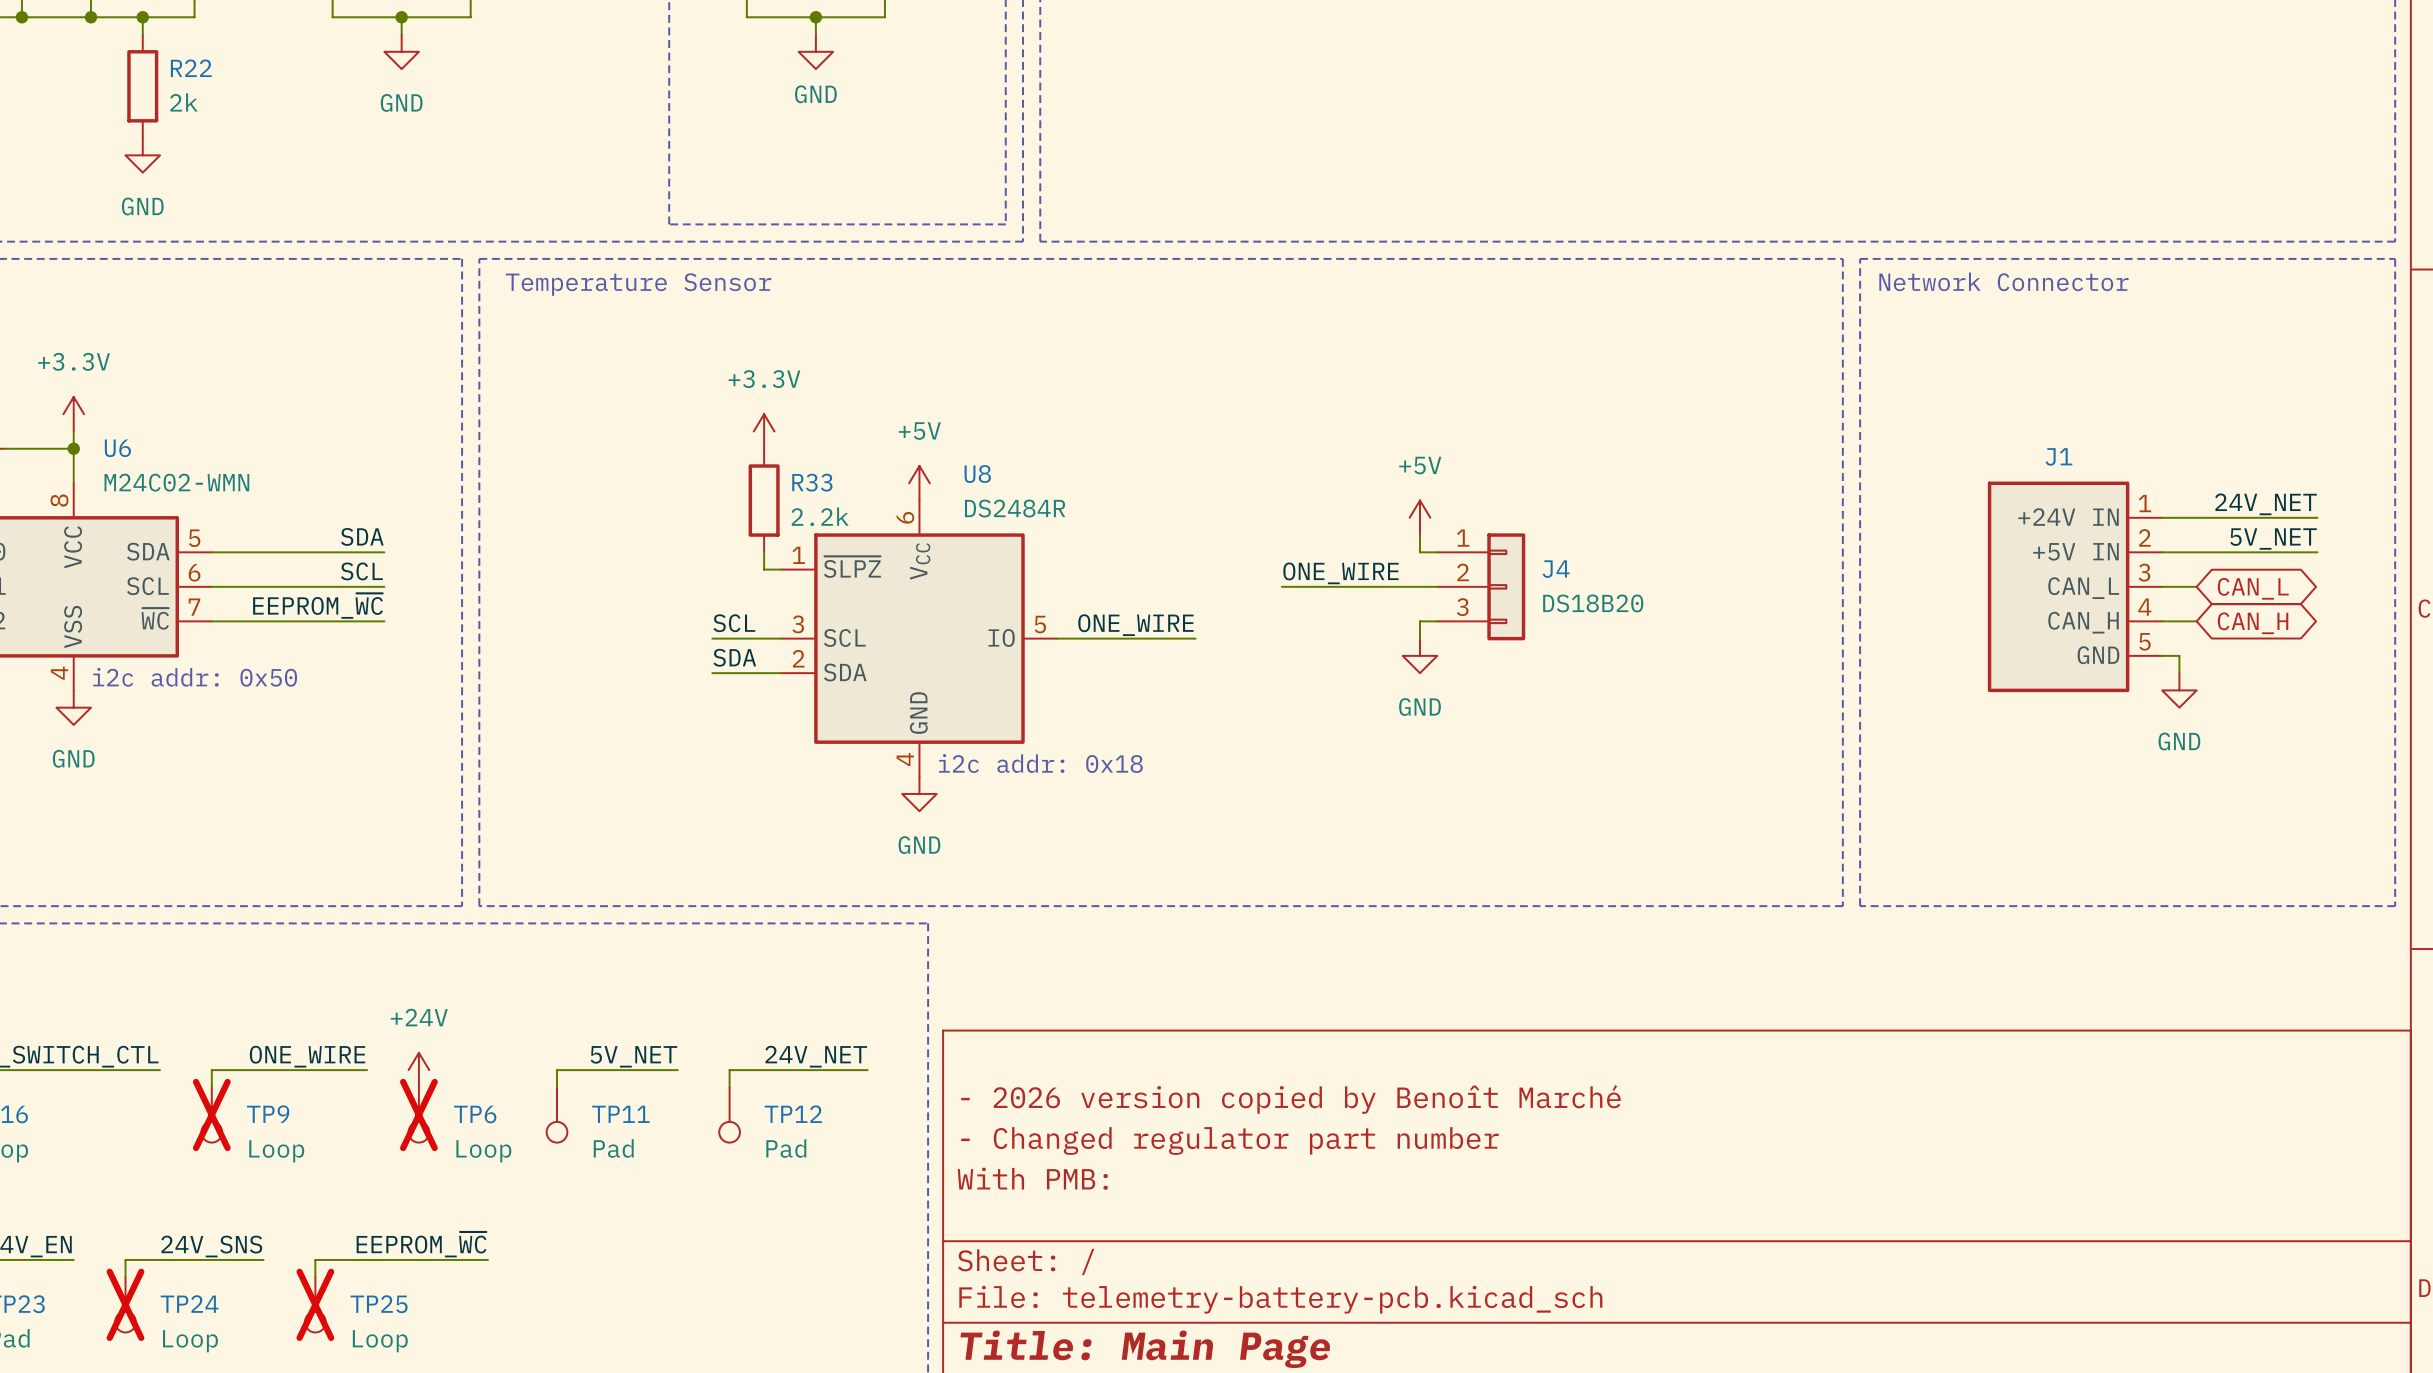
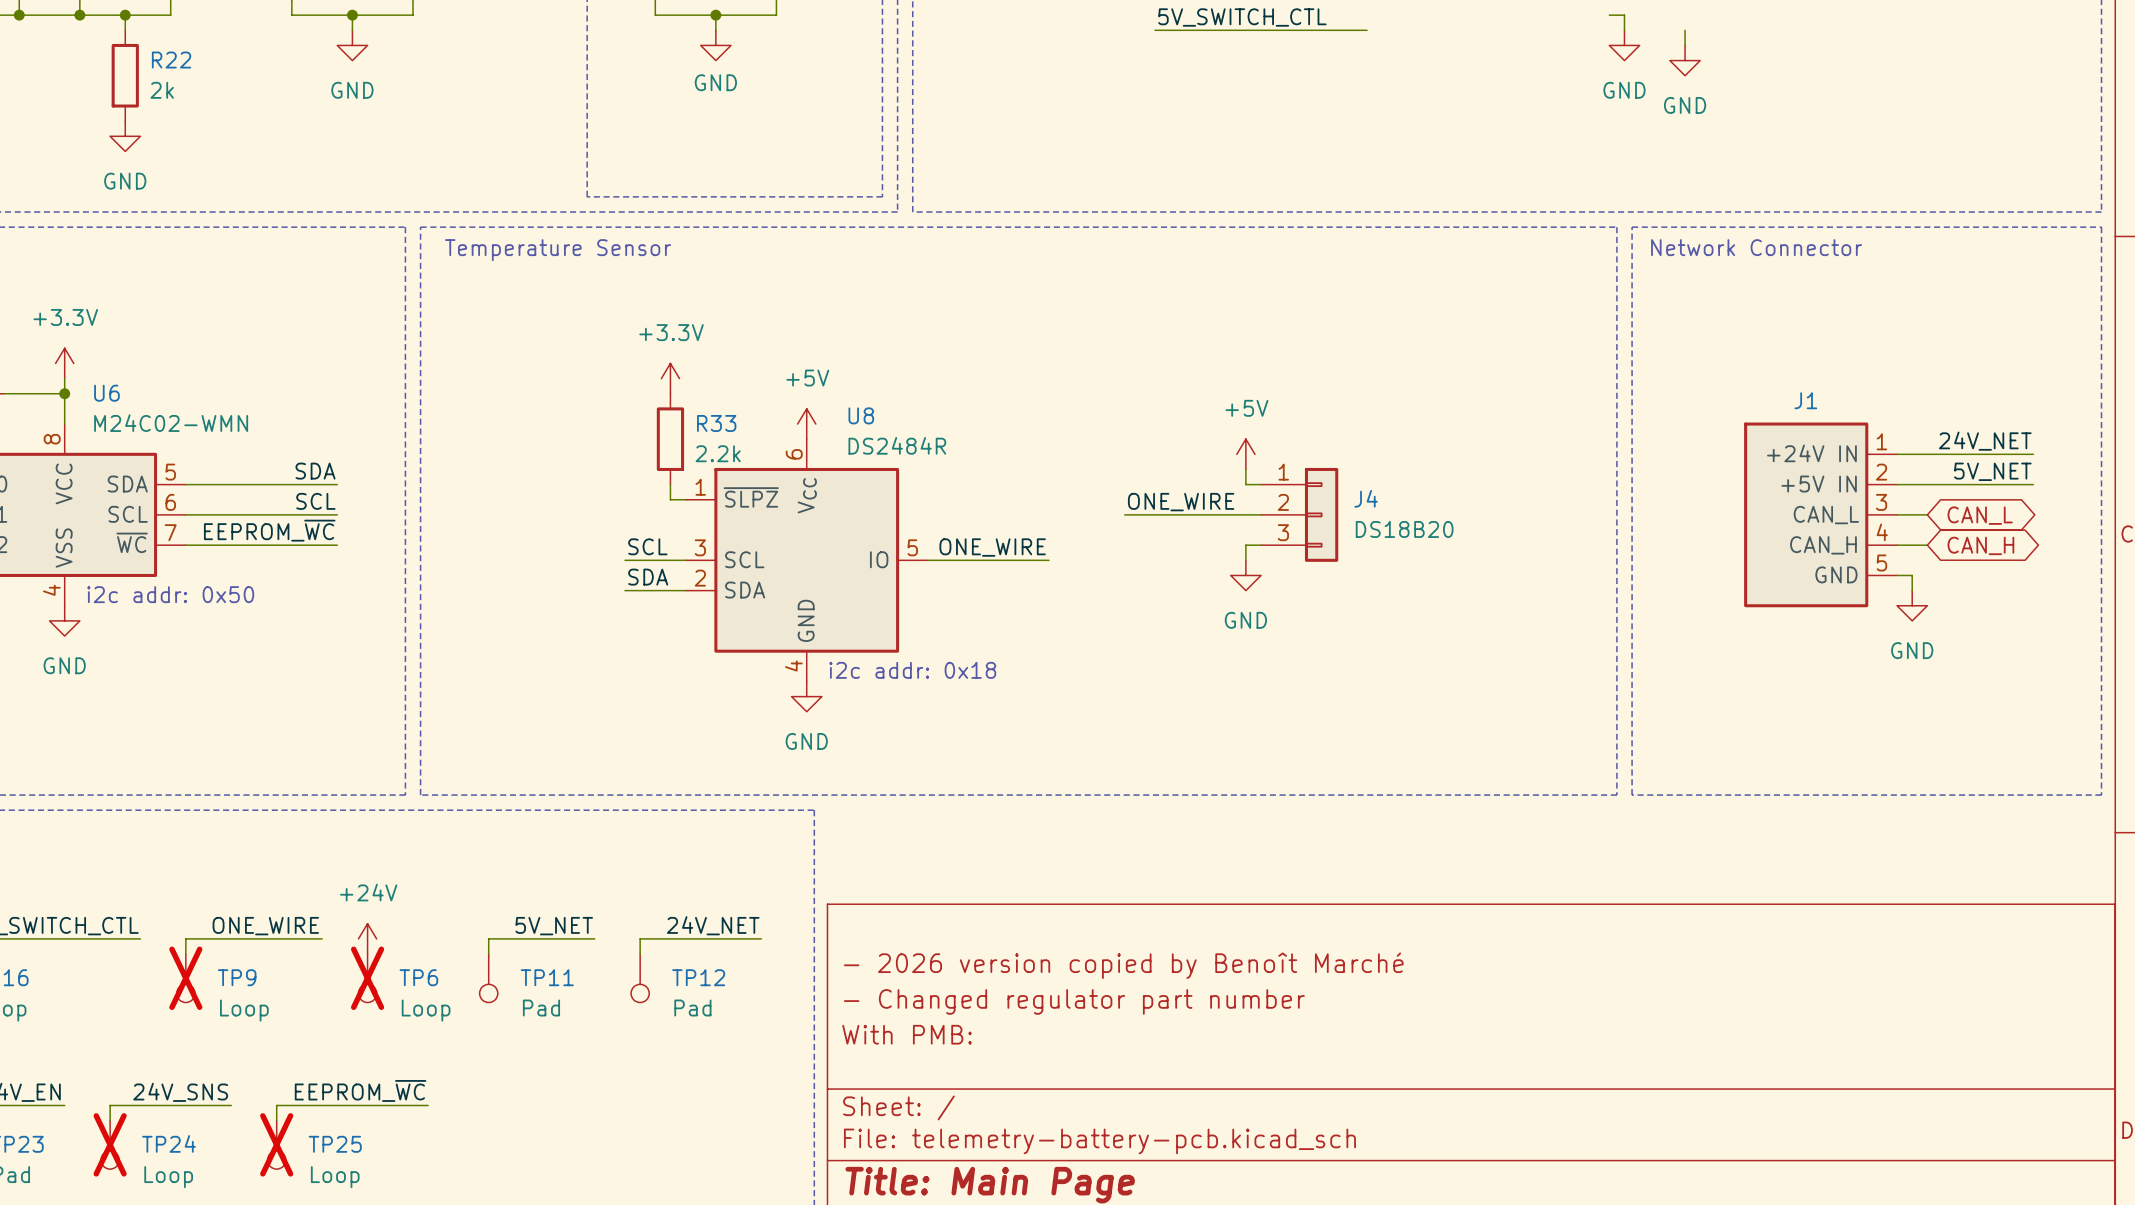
wire: none -> (1609, 15) (1624, 15) (1624, 30)
label: none -> 5V_SWITCH_CTL (1242, 17)
wire: none -> (1155, 30) (1367, 30)
wire: none -> (1685, 30) (1685, 45)
power symbol: none -> GND (1624, 45)
power symbol: none -> GND (1685, 60)

